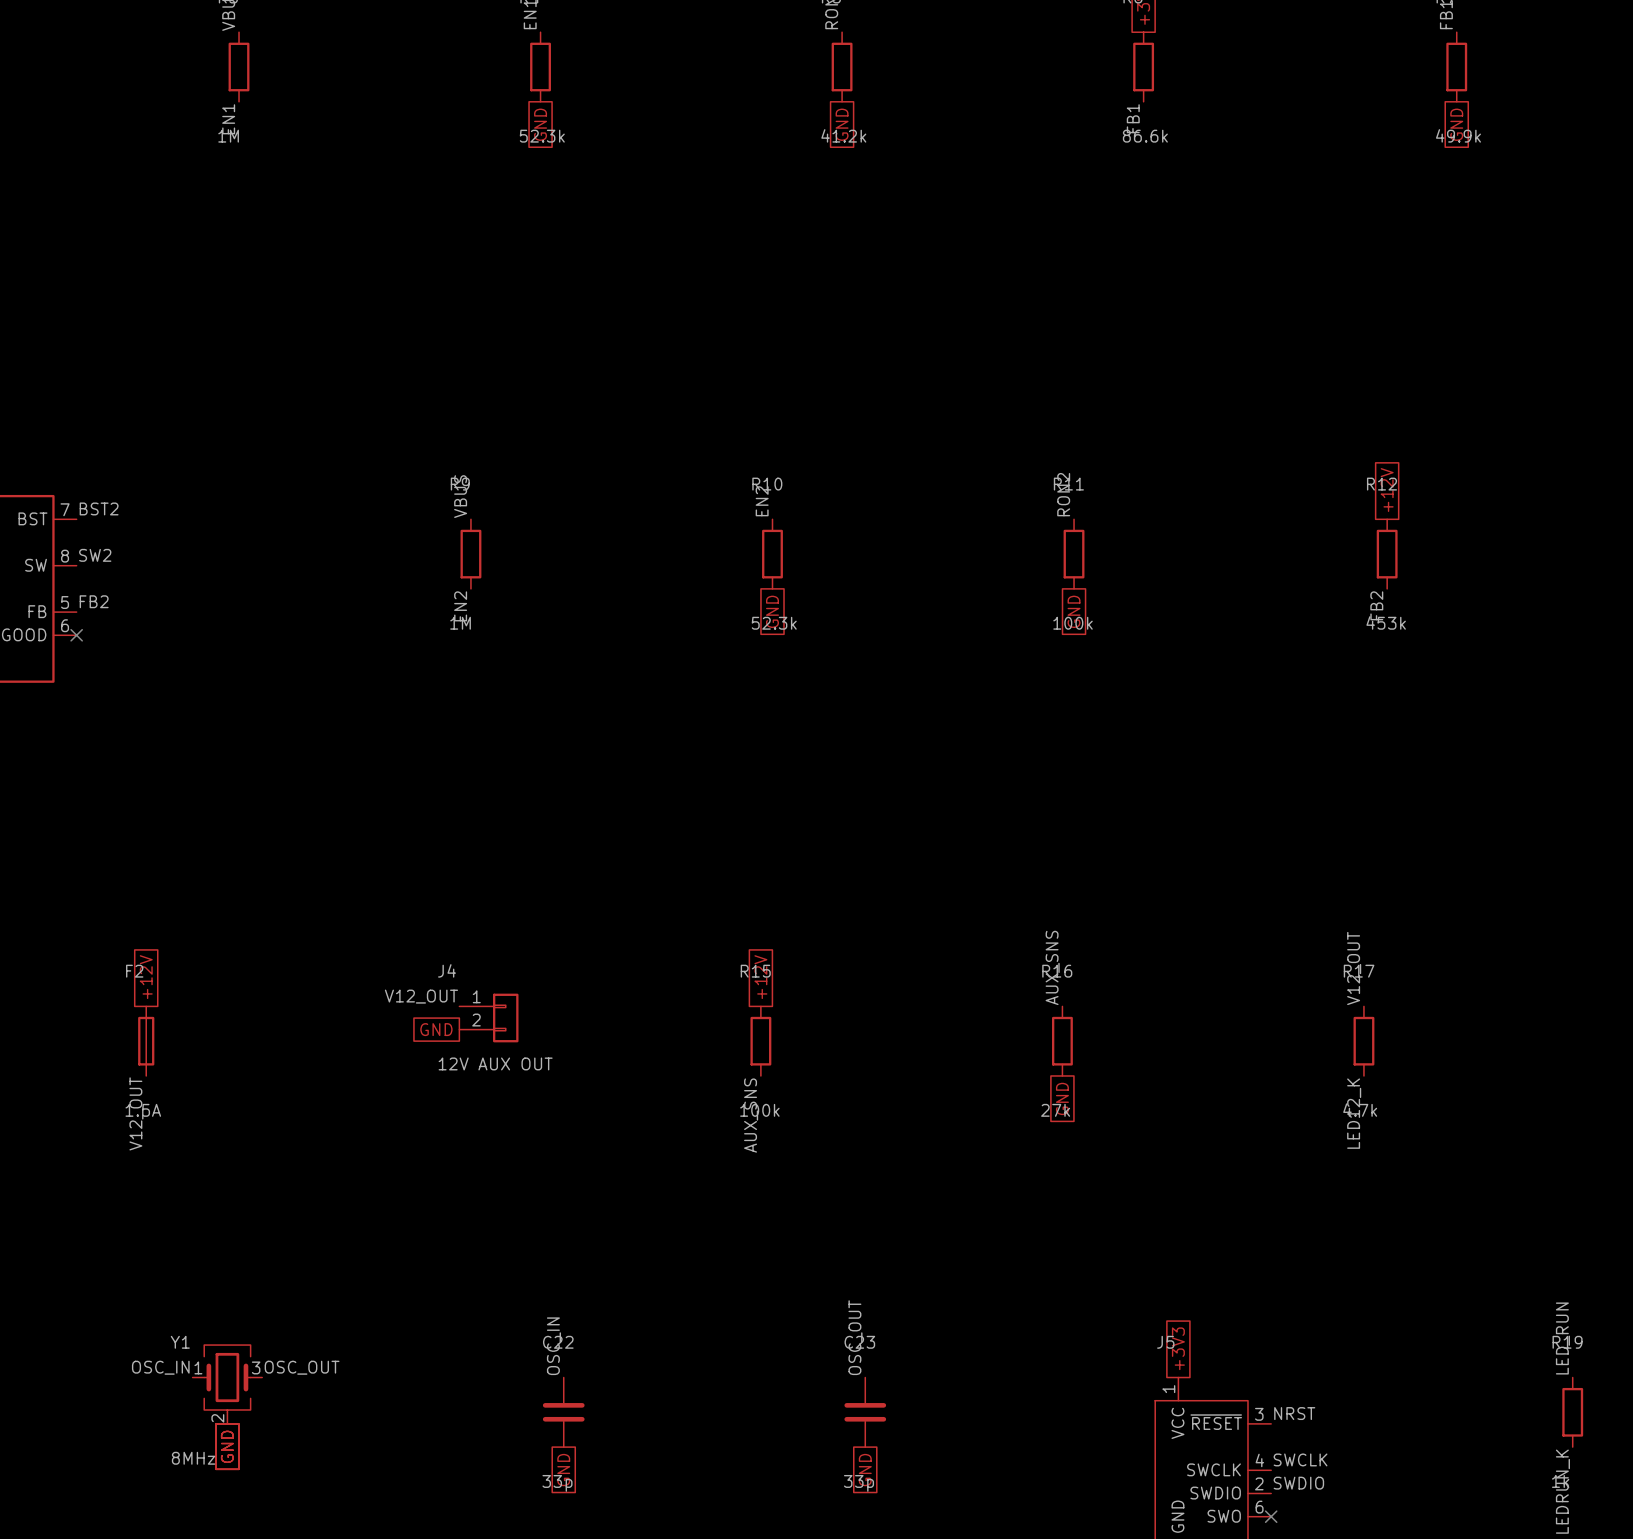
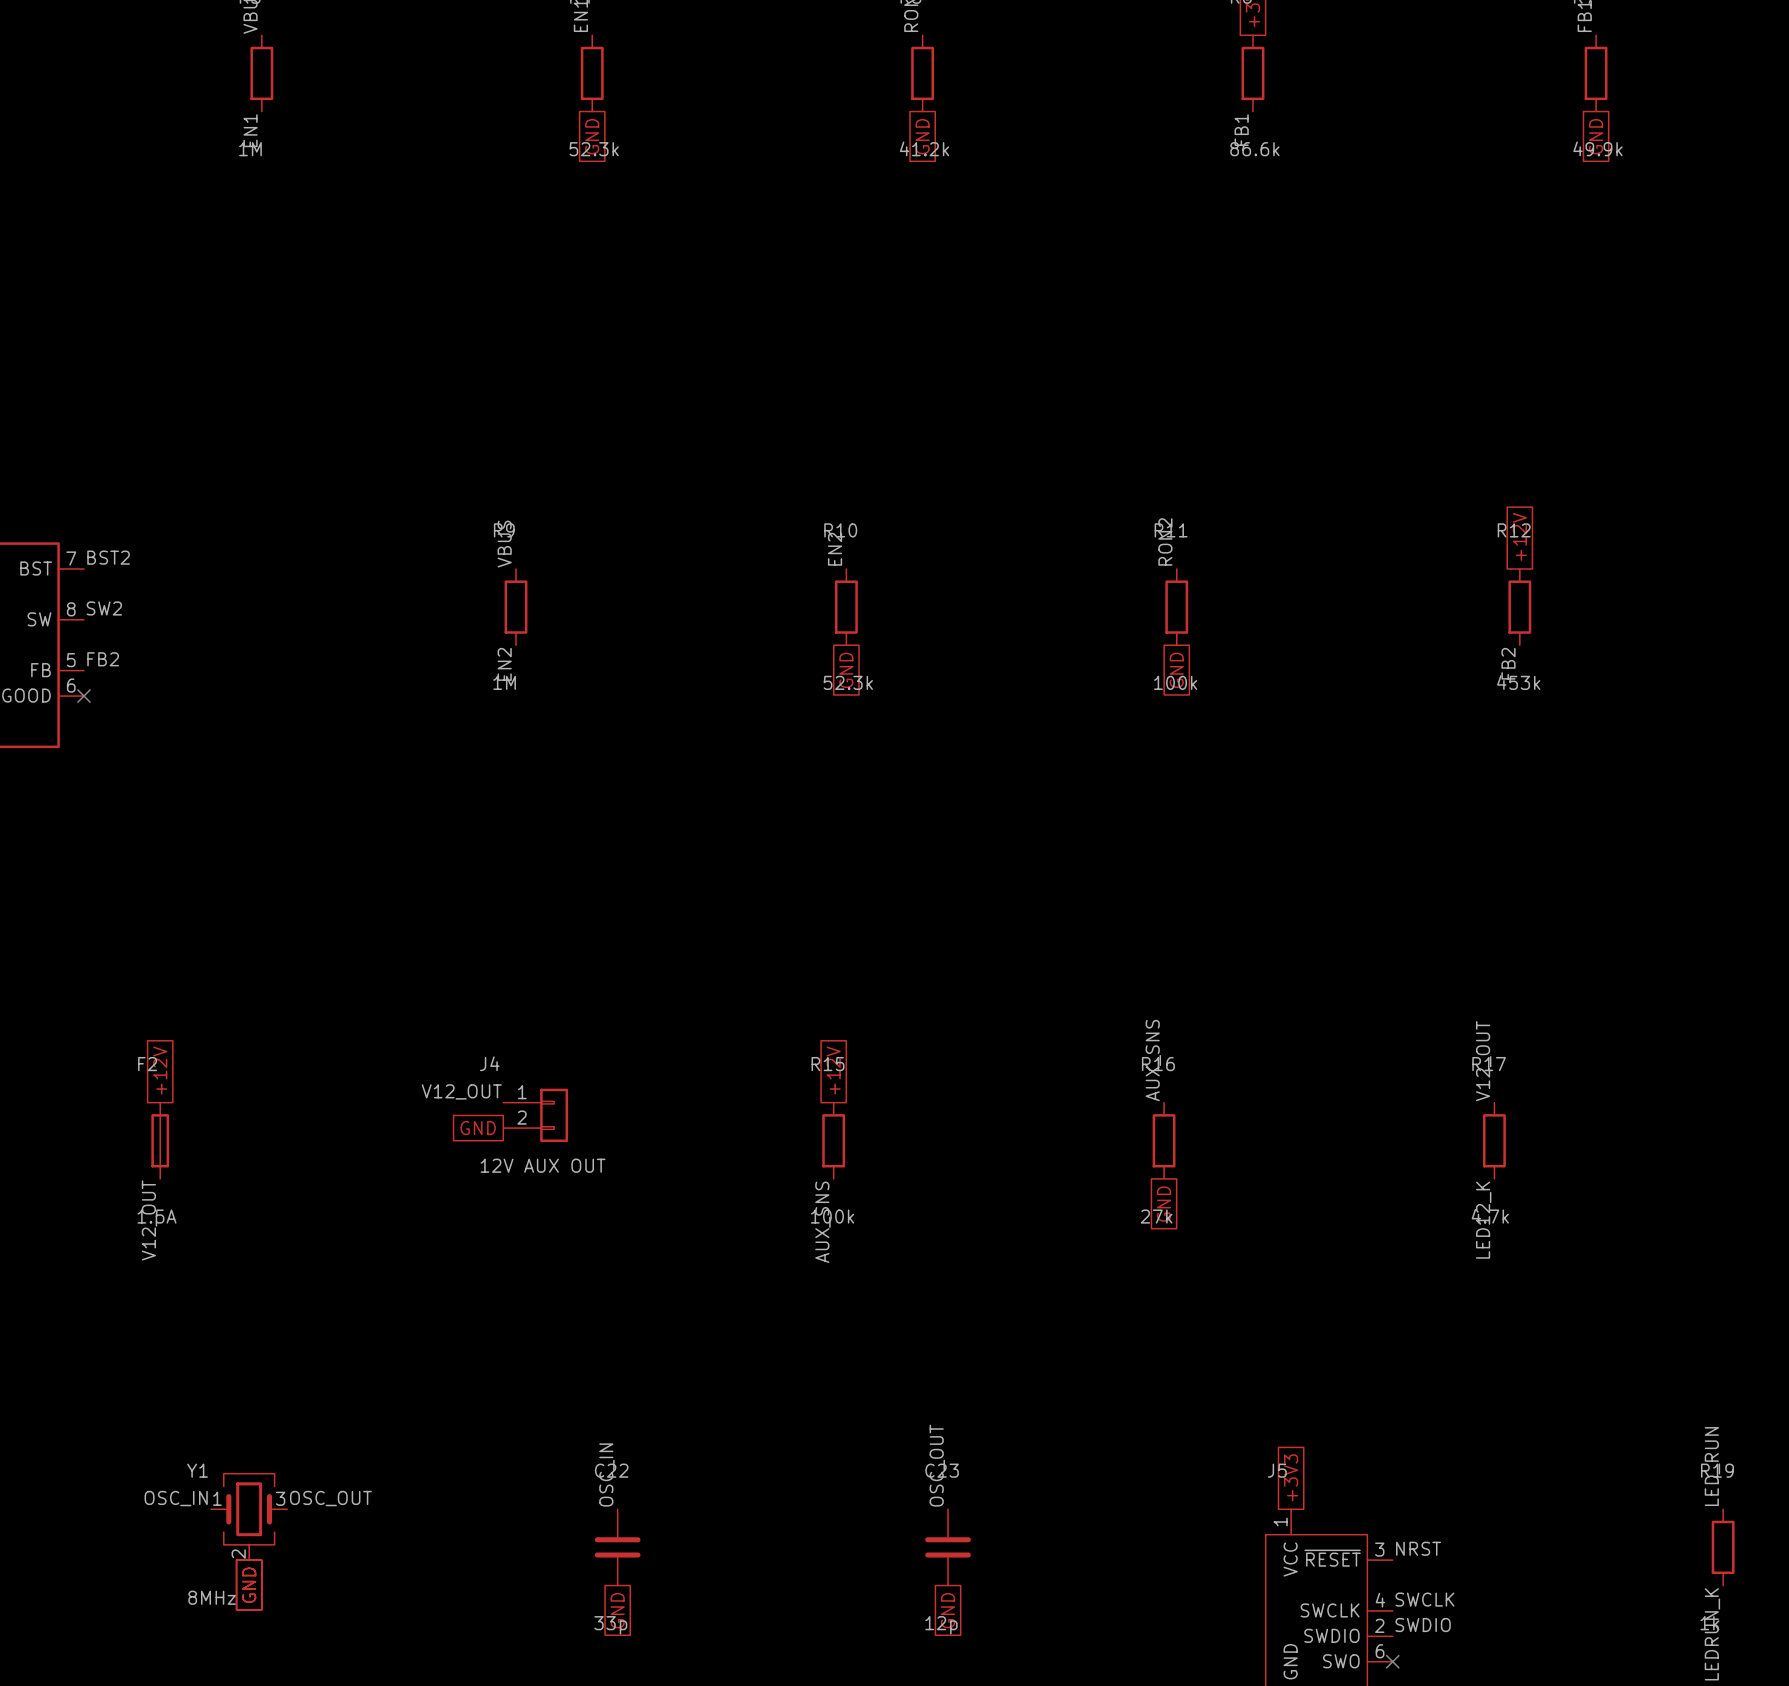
C23 value: 33p (859, 1483) -> 12p (941, 1625)

